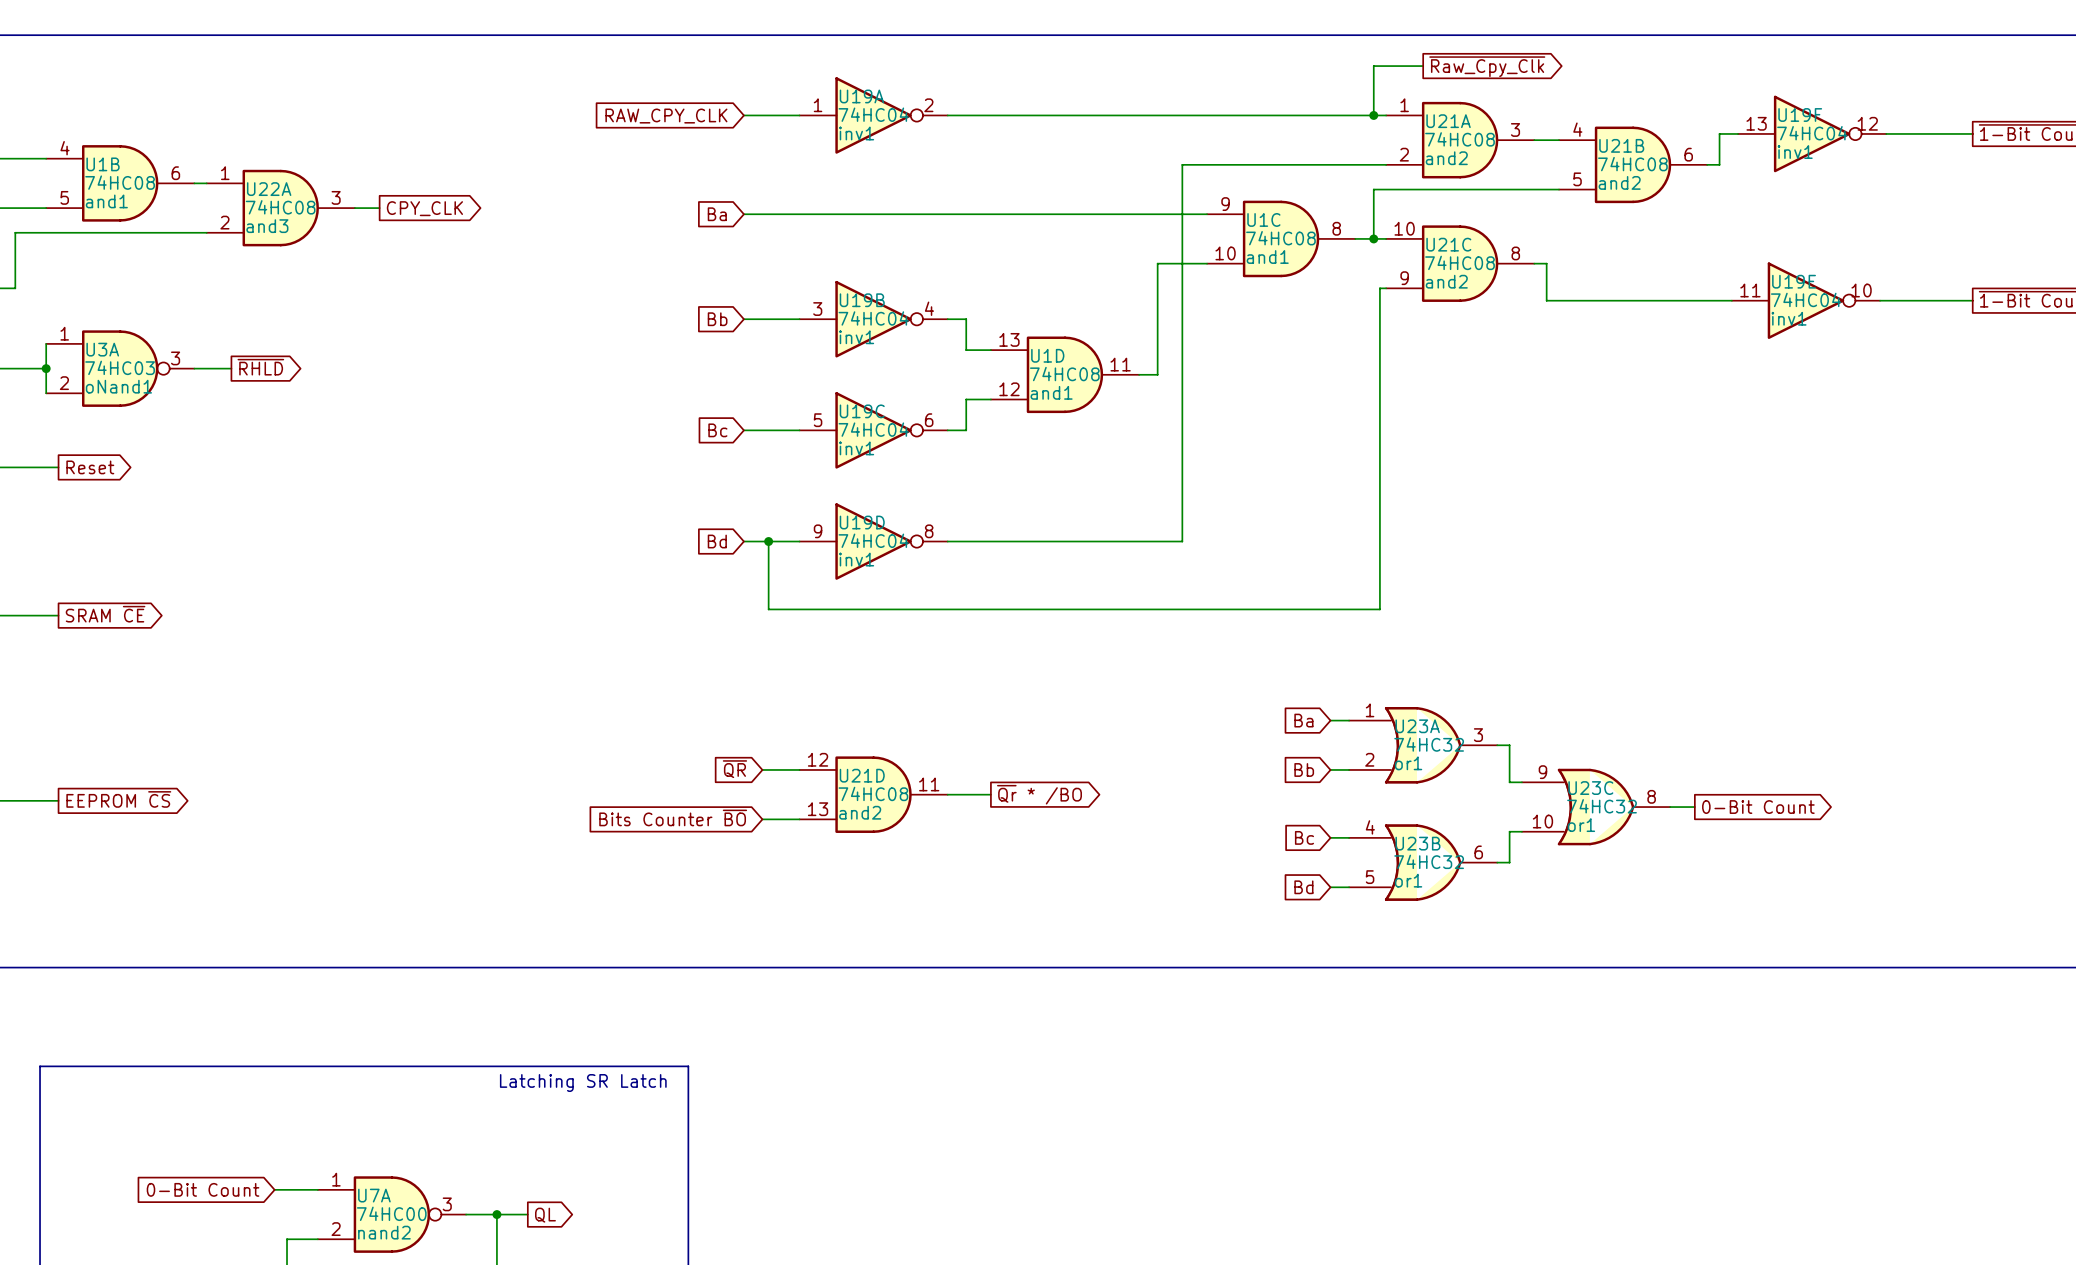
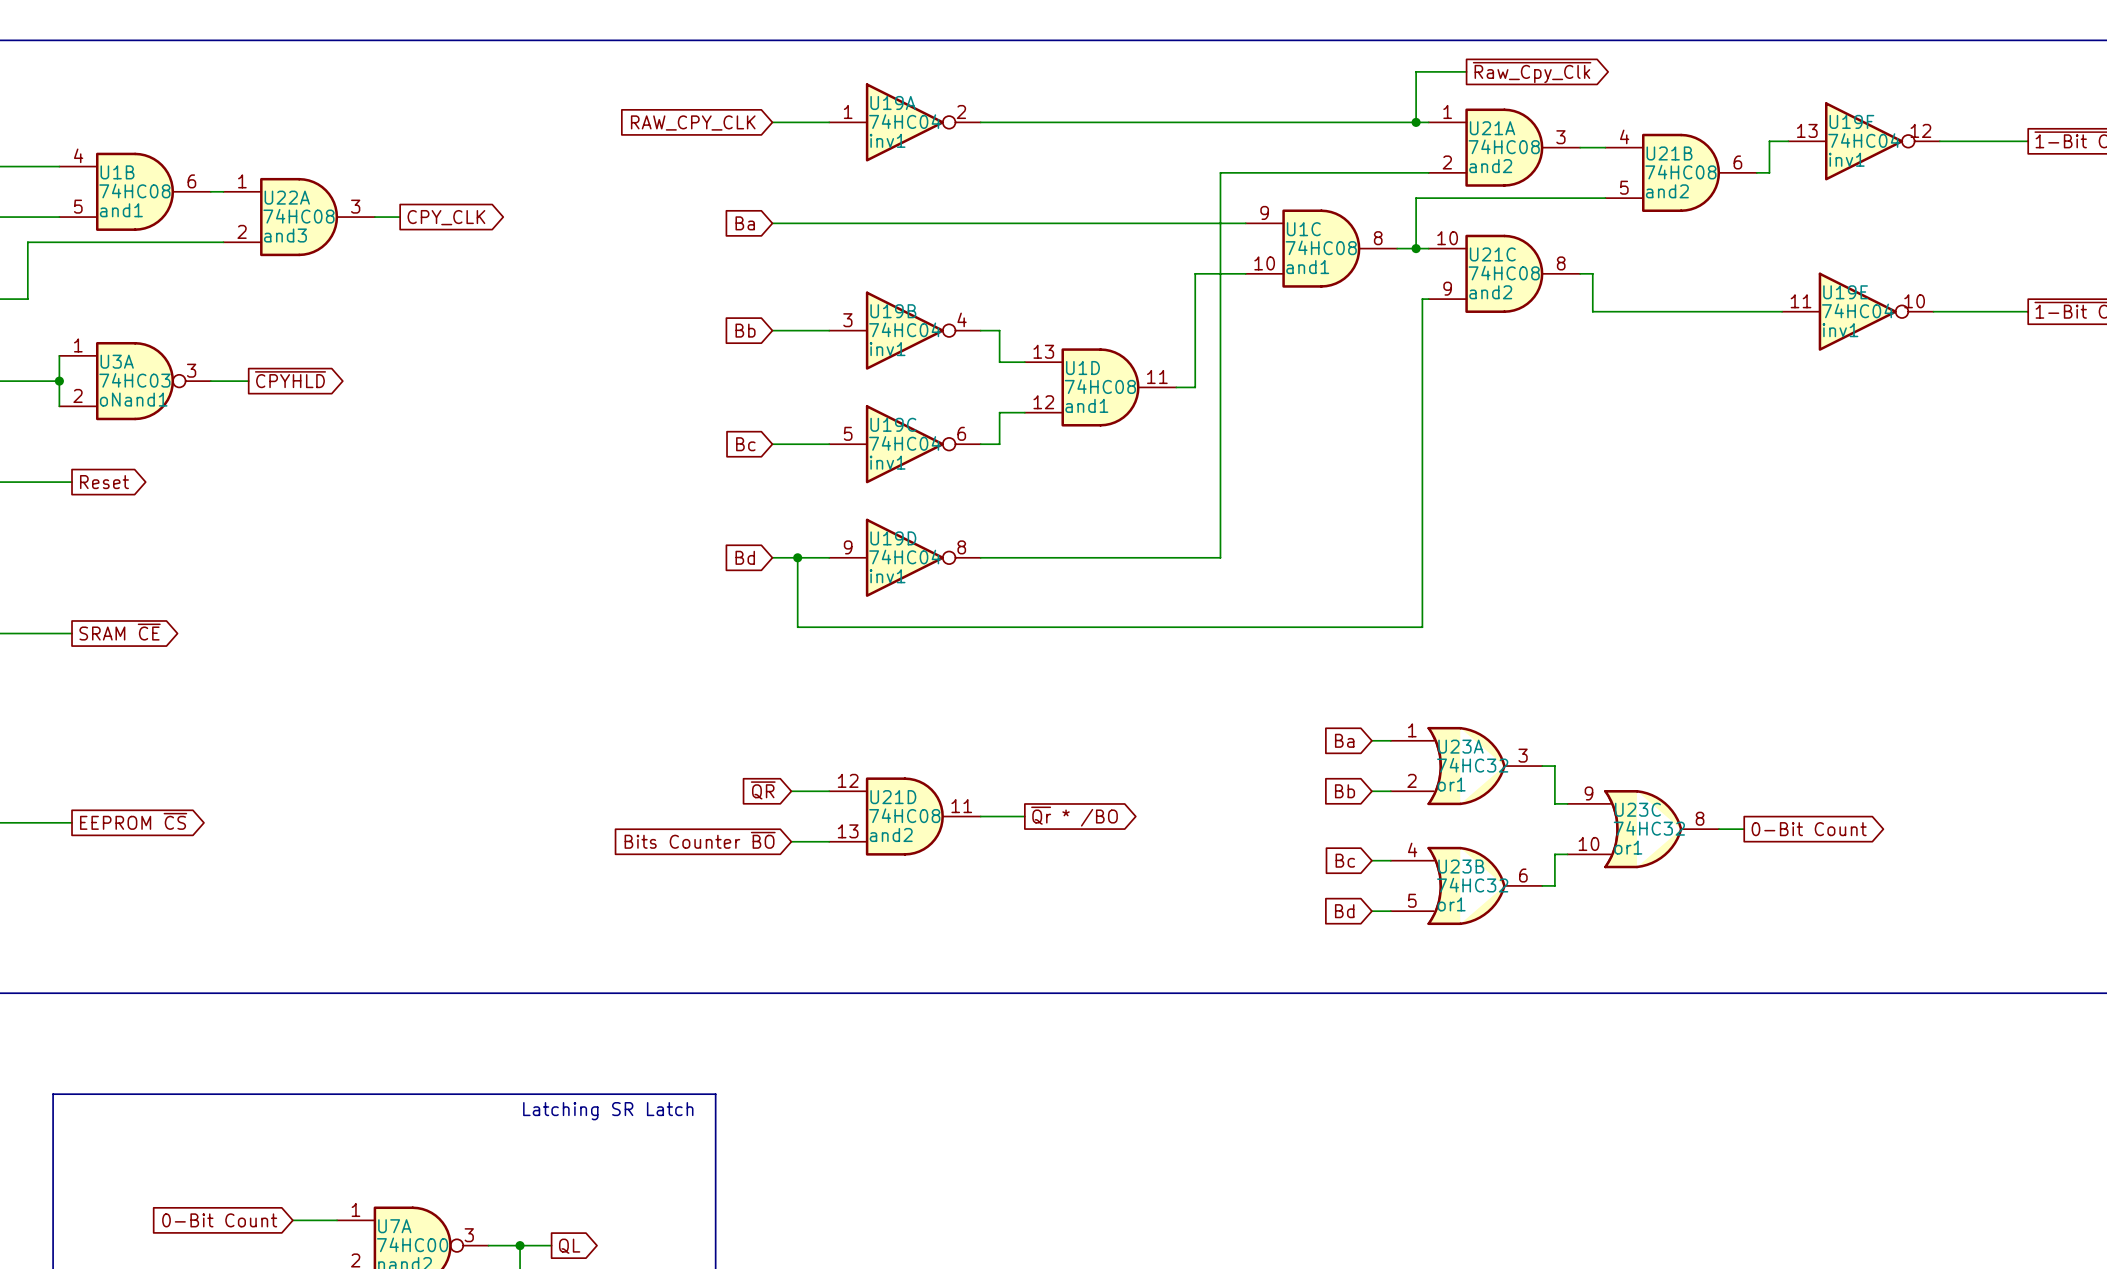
global label: ~{RHLD} (260, 367) -> ~{CPYHLD} (290, 379)

